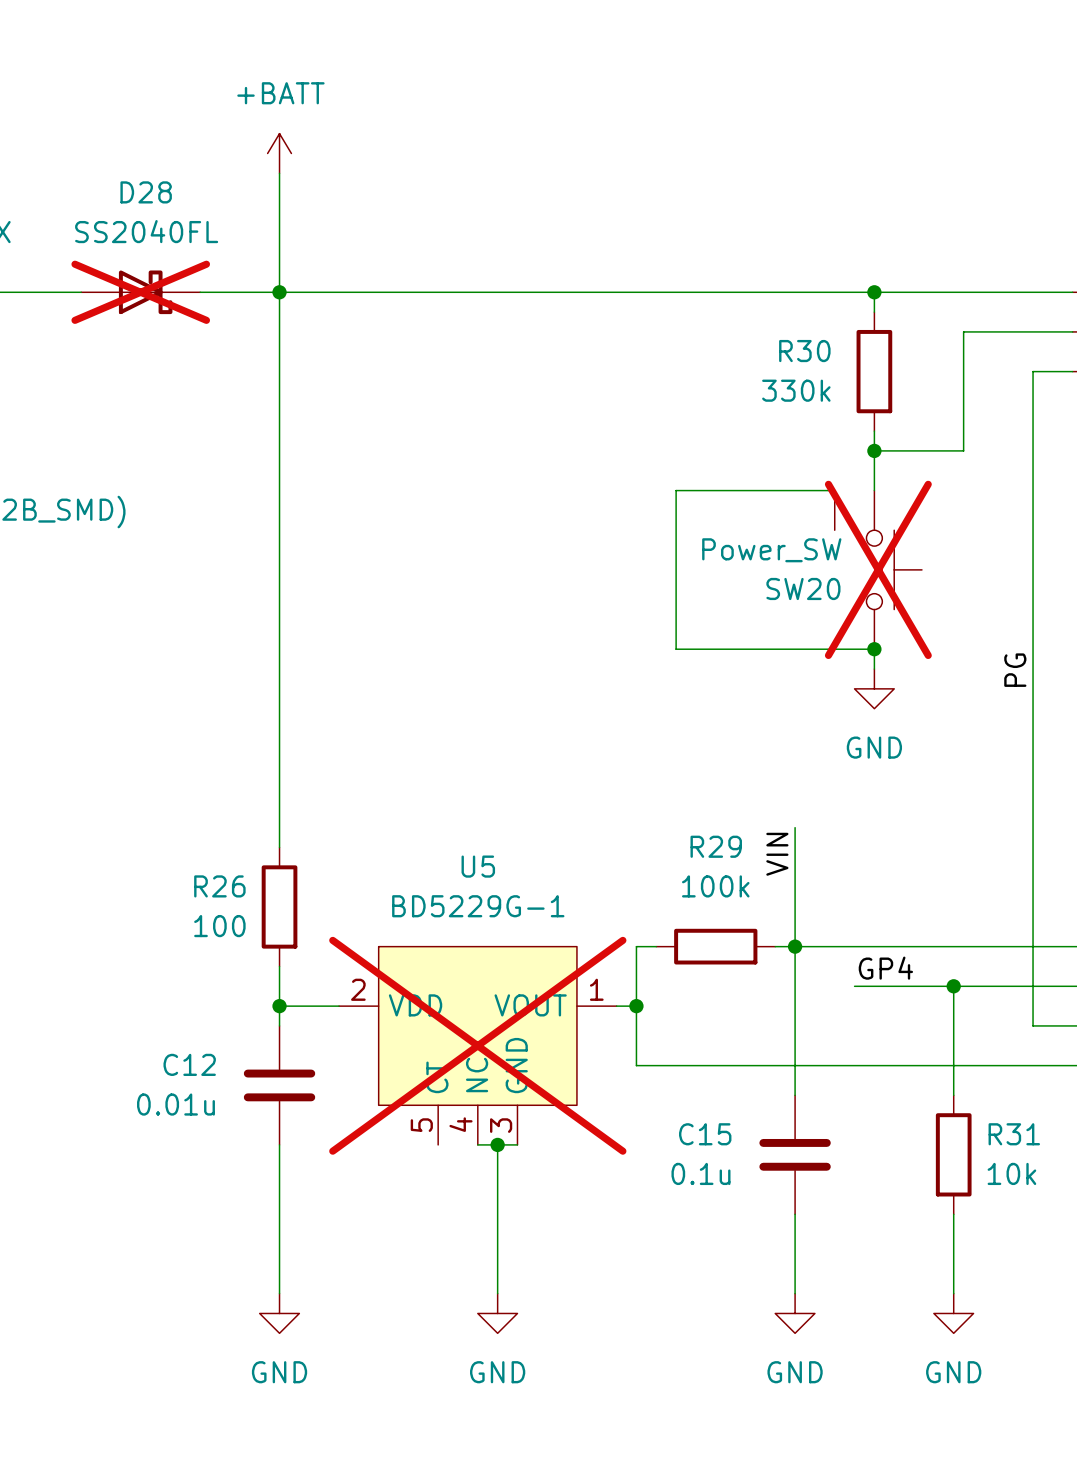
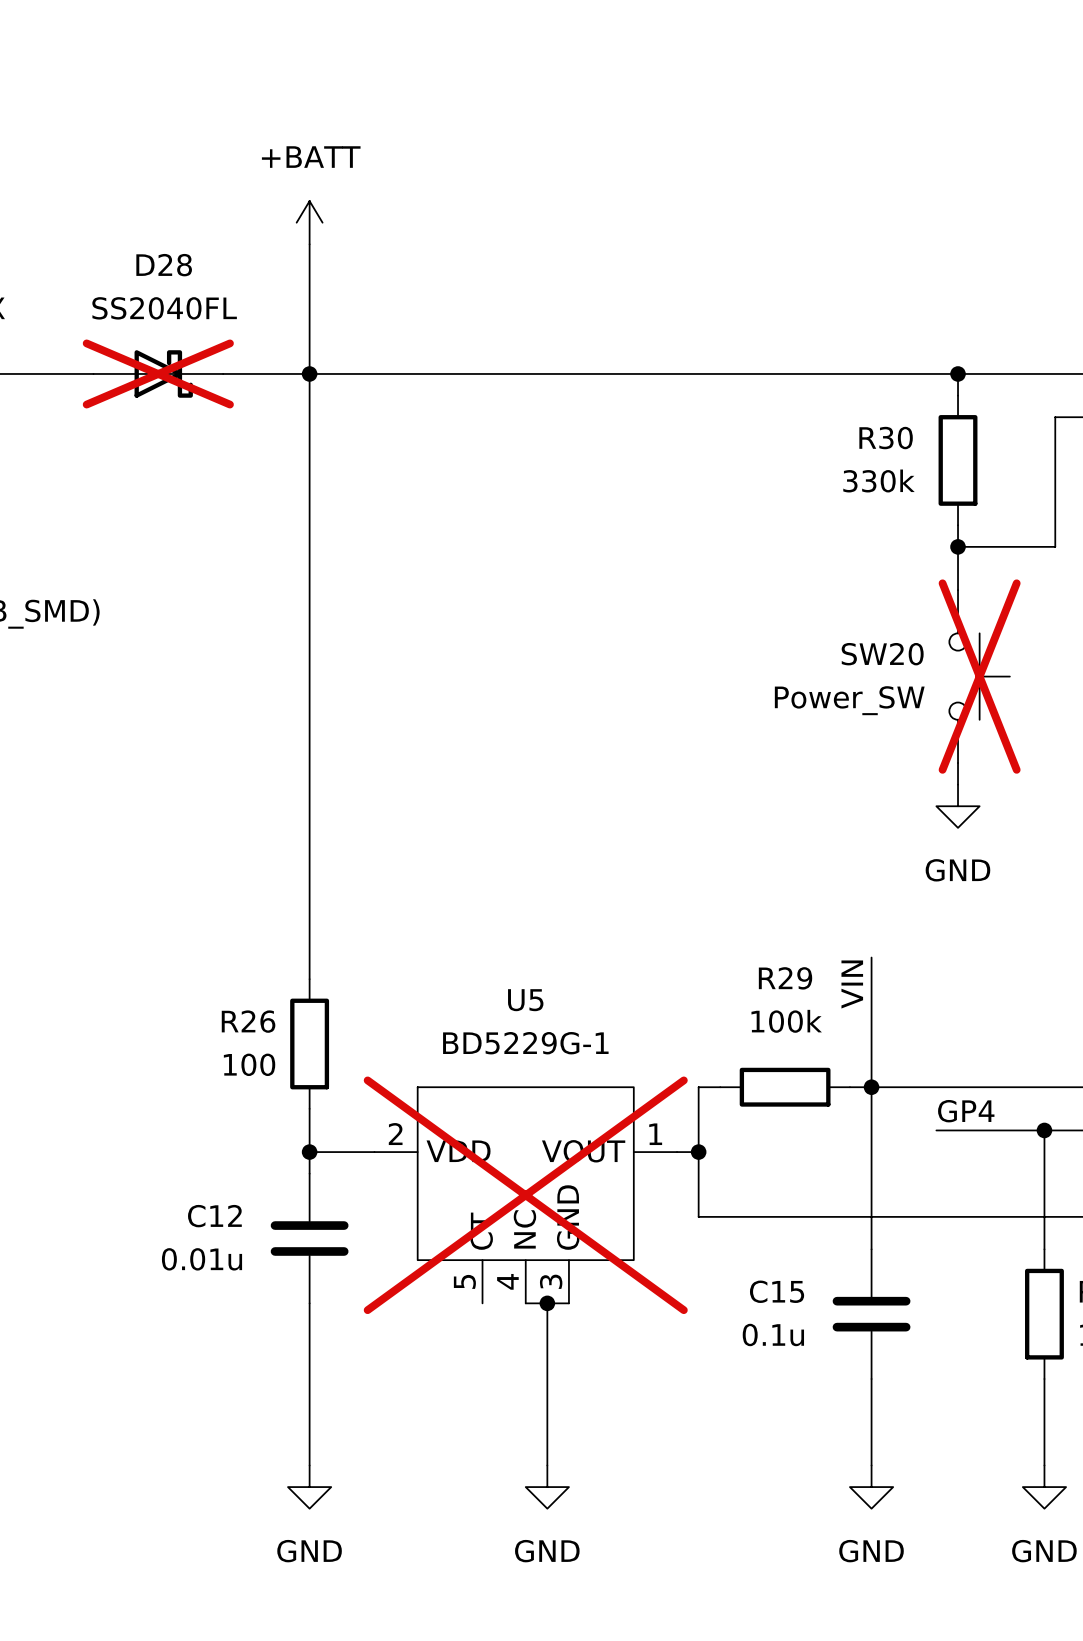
wire: (834, 490) (676, 490) (676, 649) (874, 649) -> none
SW20 symbol: [834, 490, 922, 650] -> [949, 590, 1010, 764]
SW20 value position: Power_SW (771, 550) -> Power_SW (849, 700)
SW20 name position: SW20 (803, 588) -> SW20 (882, 654)
junction: (874, 649) -> none

